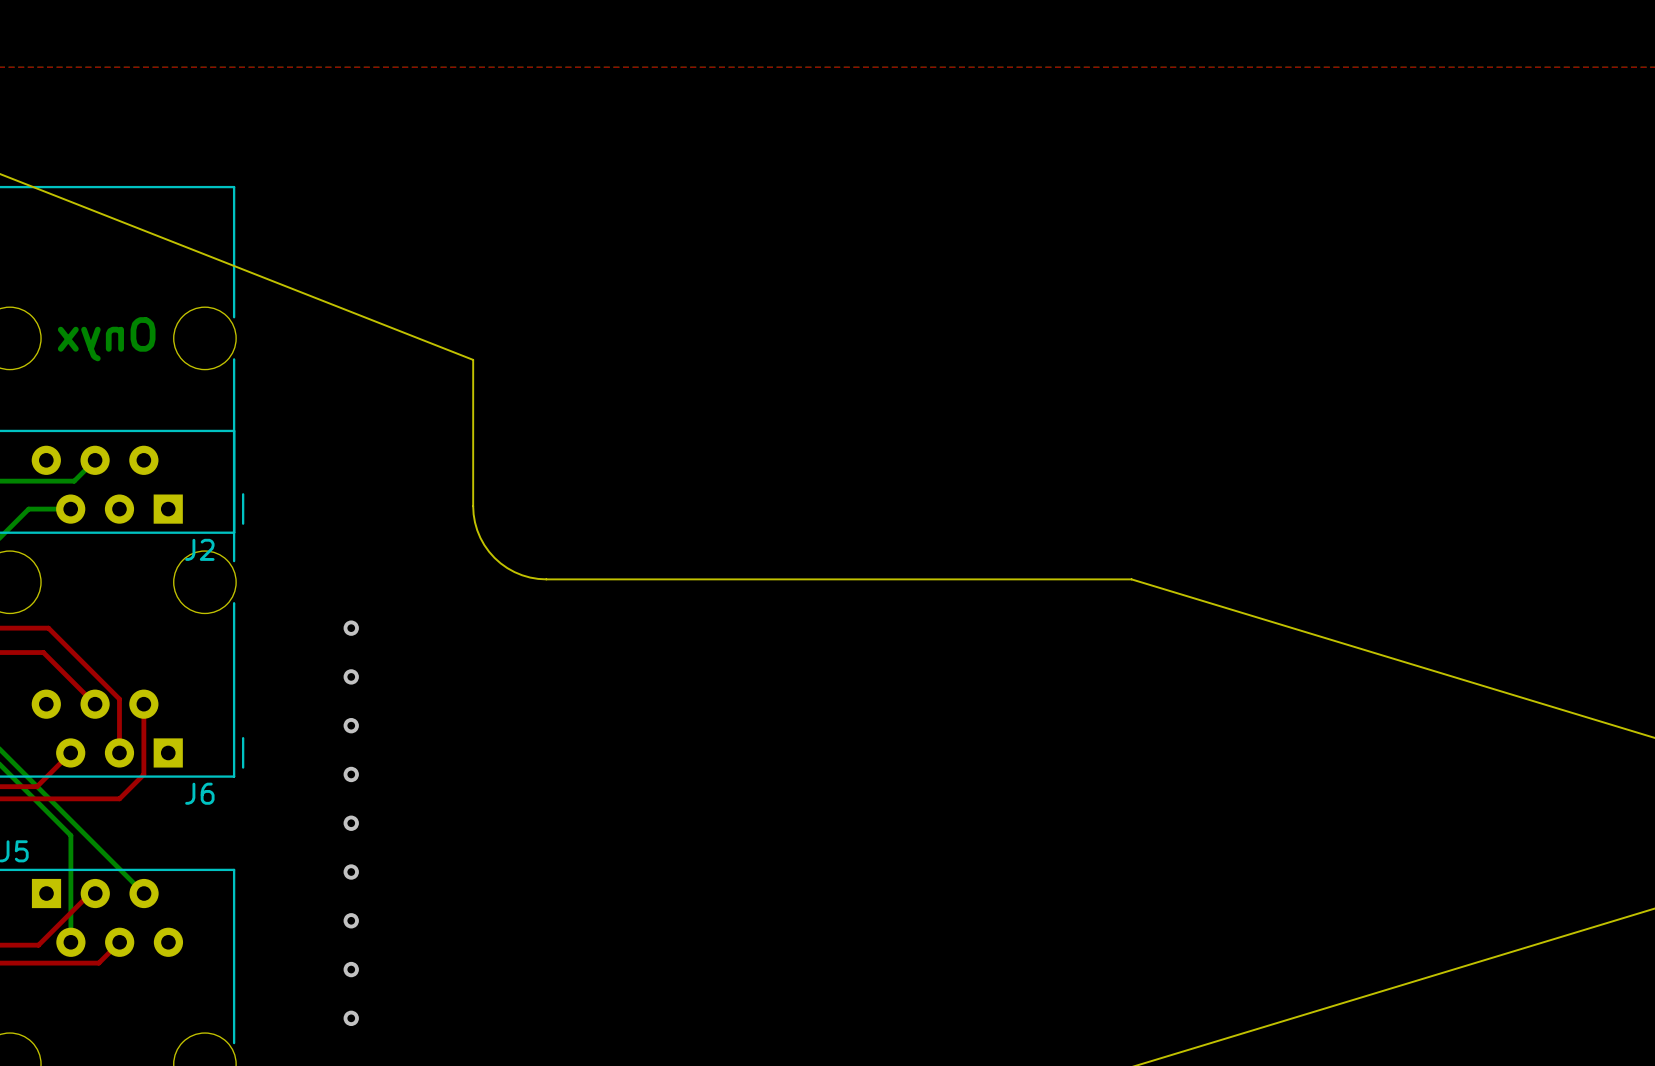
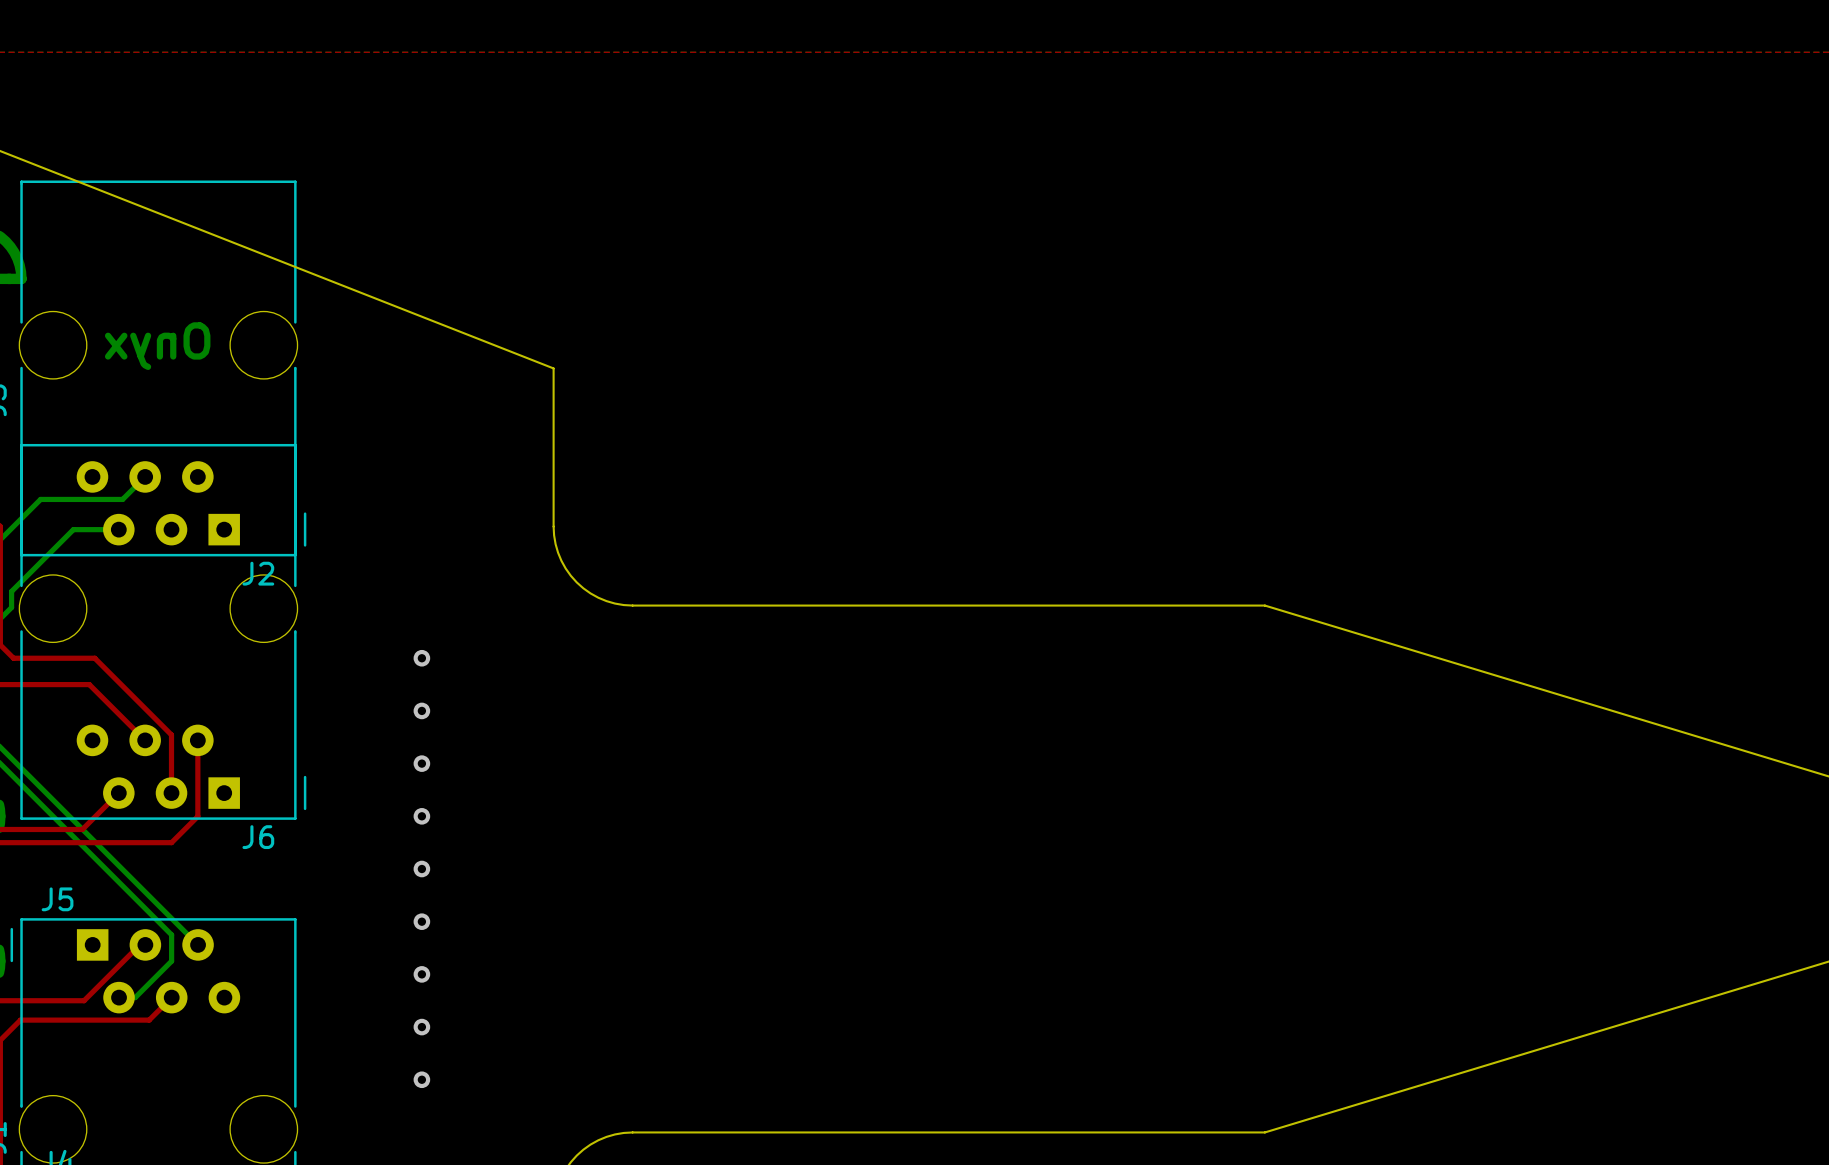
bottom track: (70, 835) (70, 942) -> (119, 882) (171, 934) (171, 961) (135, 997) (119, 997)

